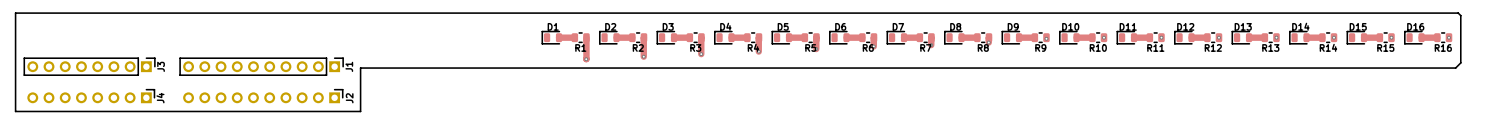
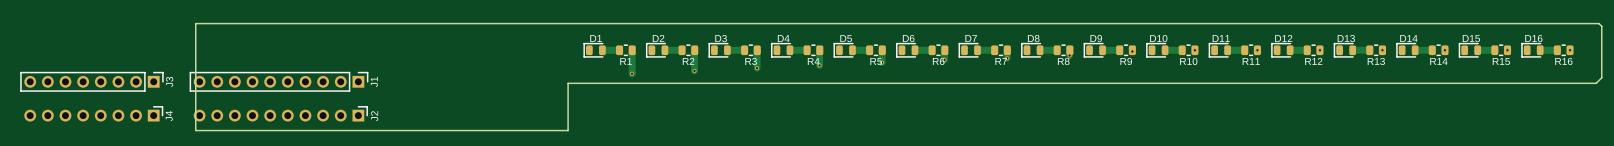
board edge: (15, 13) (1458, 13) (1460, 15) (1460, 62) (1455, 68) (360, 68) (360, 111) (15, 111) (15, 13) -> (195, 23) (195, 130) (568, 130) (568, 83) (1596, 83) (1601, 77) (1601, 26) (1598, 23) (195, 23)

